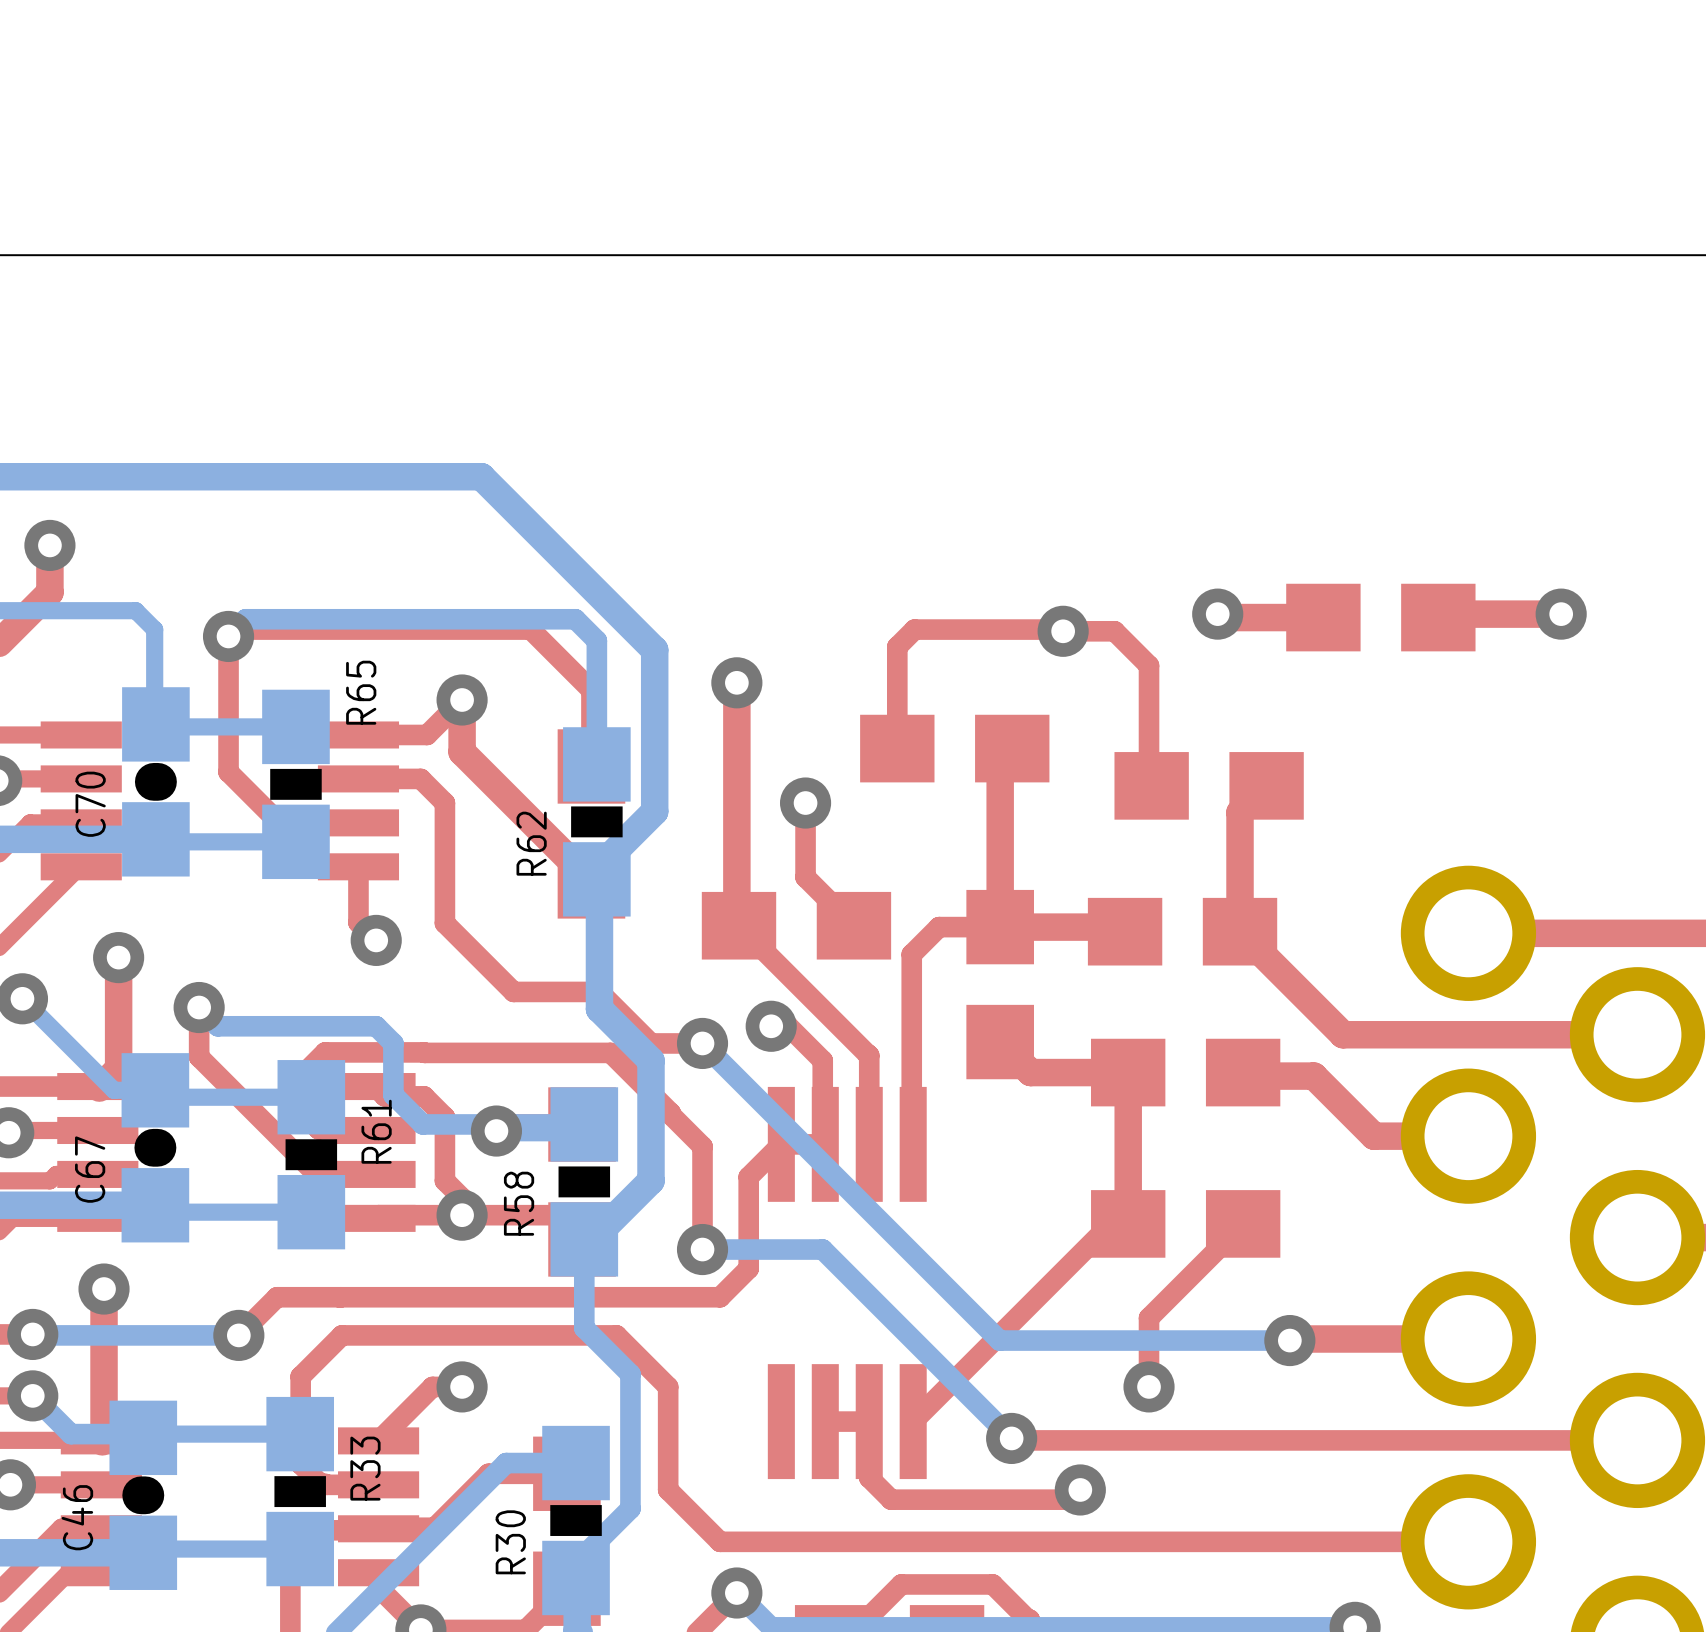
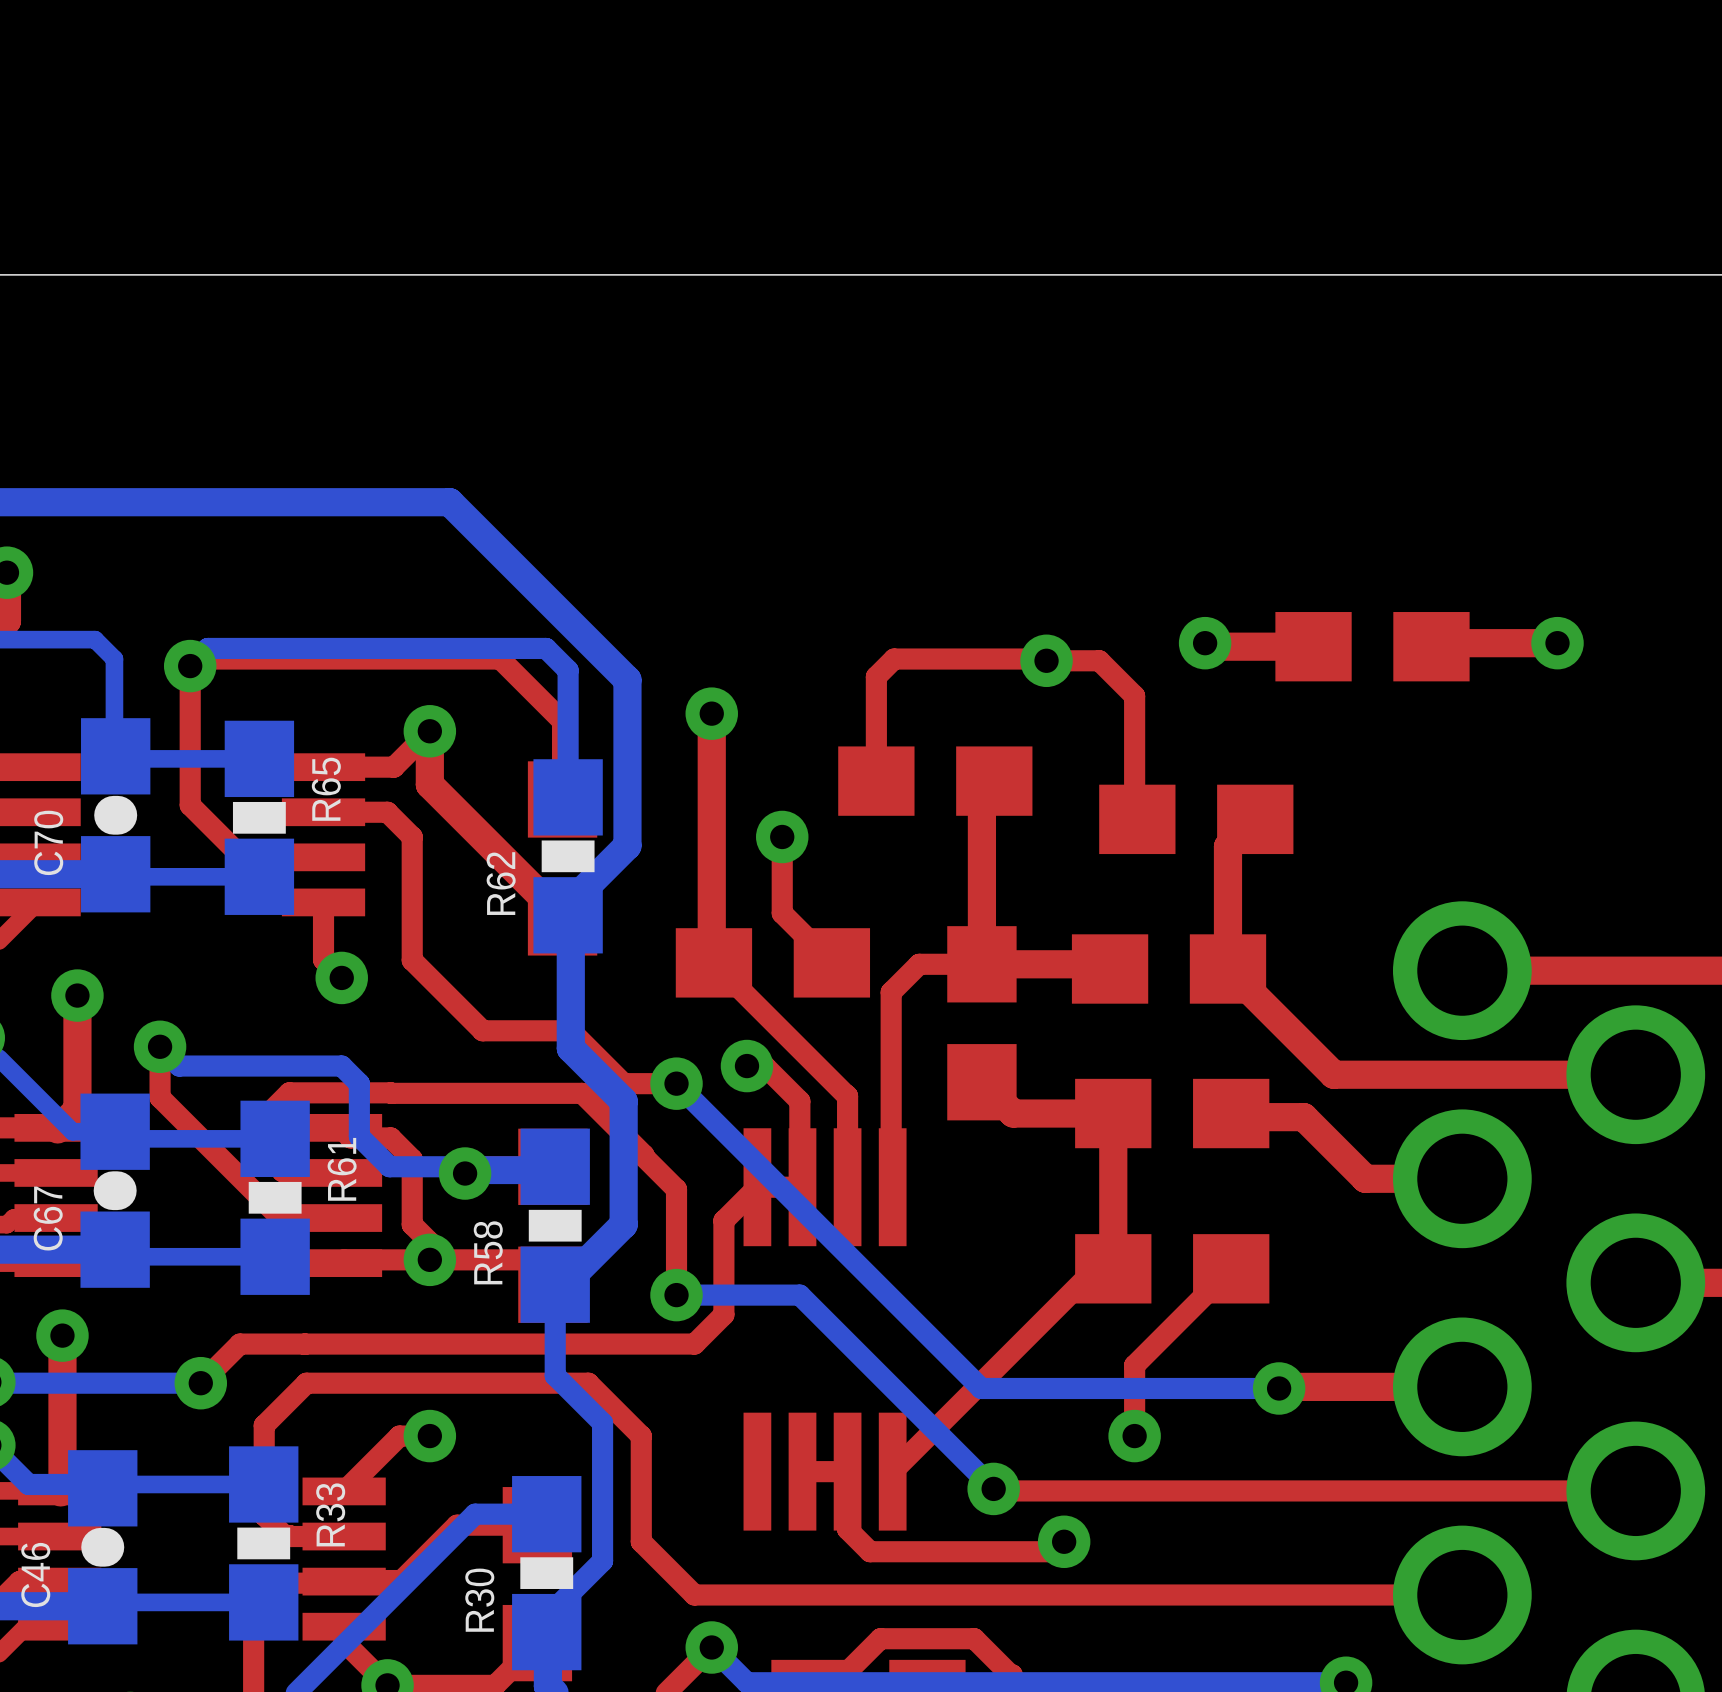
R65 name position: R65 (361, 692) -> R65 (326, 789)

